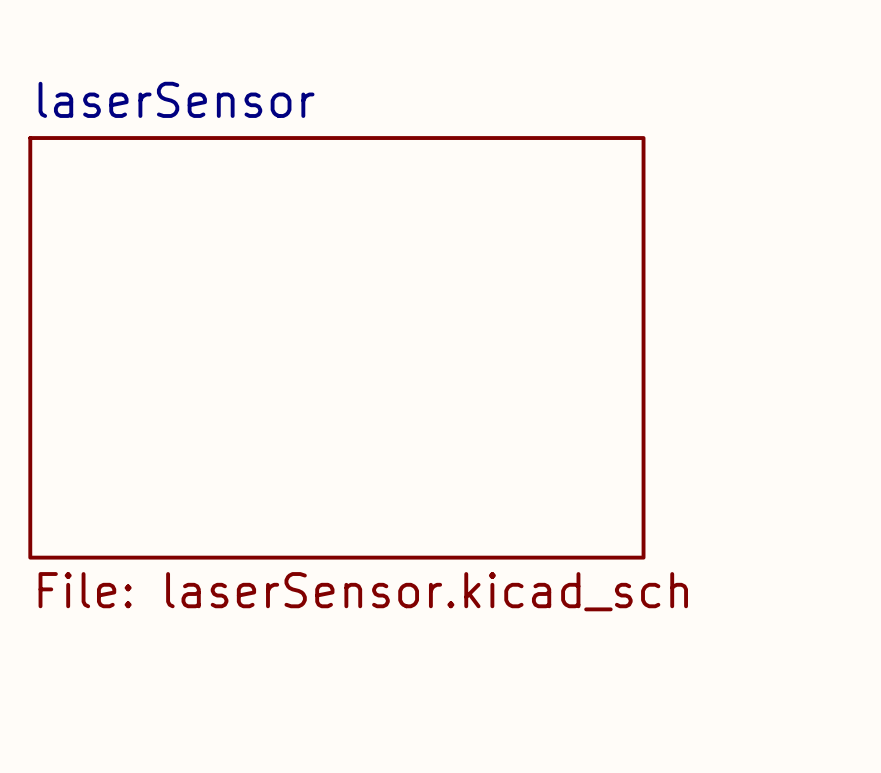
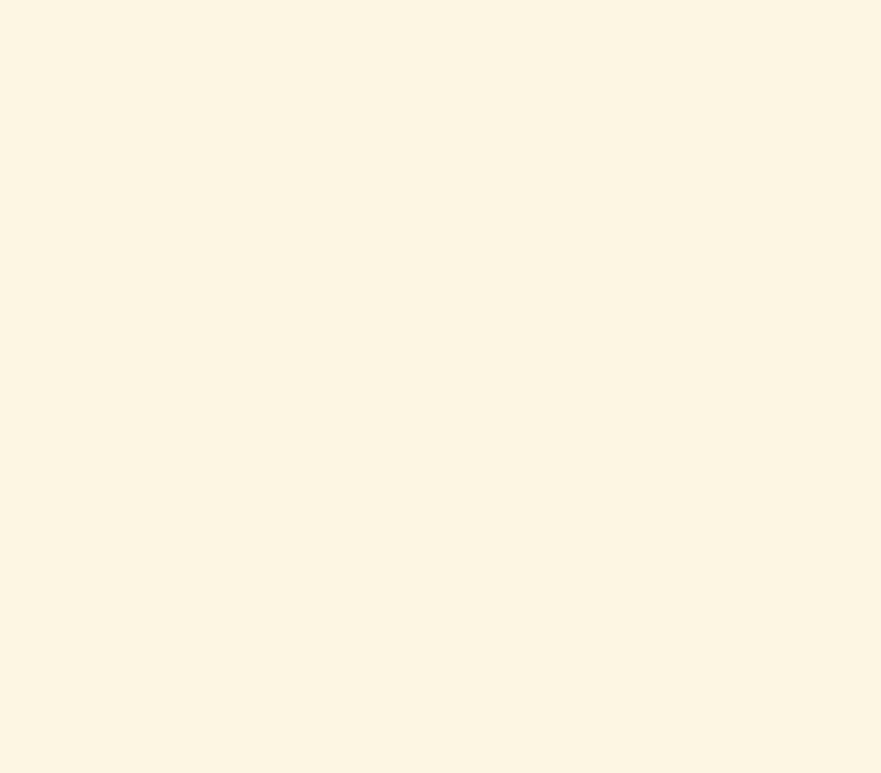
sheet laserSensor: File: laserSensor.kicad_sch (336, 347) -> none

